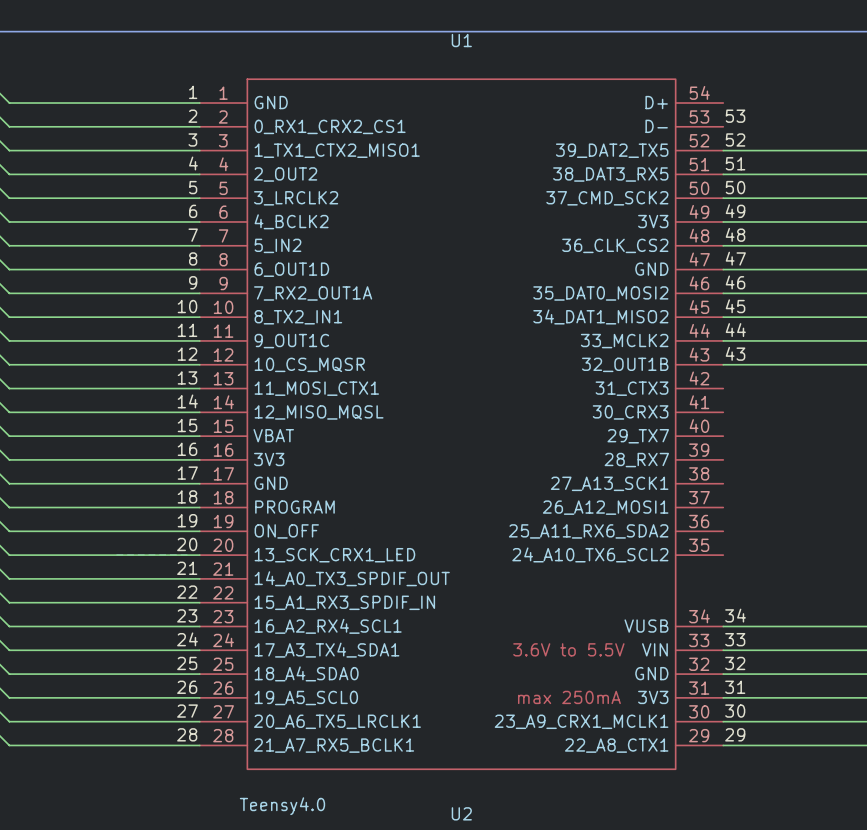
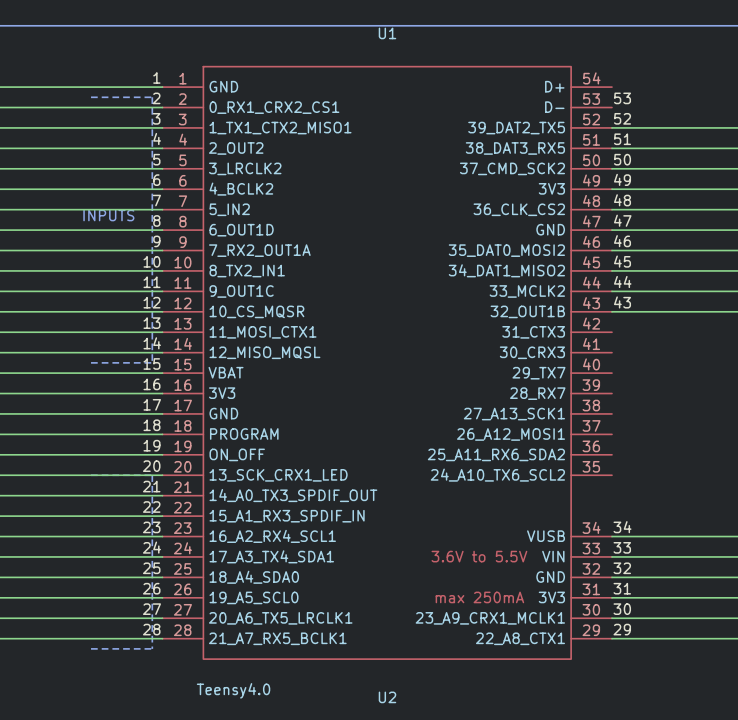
line: none -> (91, 97) (152, 97) (152, 362) (91, 362)
text: none -> INPUTS (108, 215)
line: none -> (152, 475) (152, 648) (91, 648)

